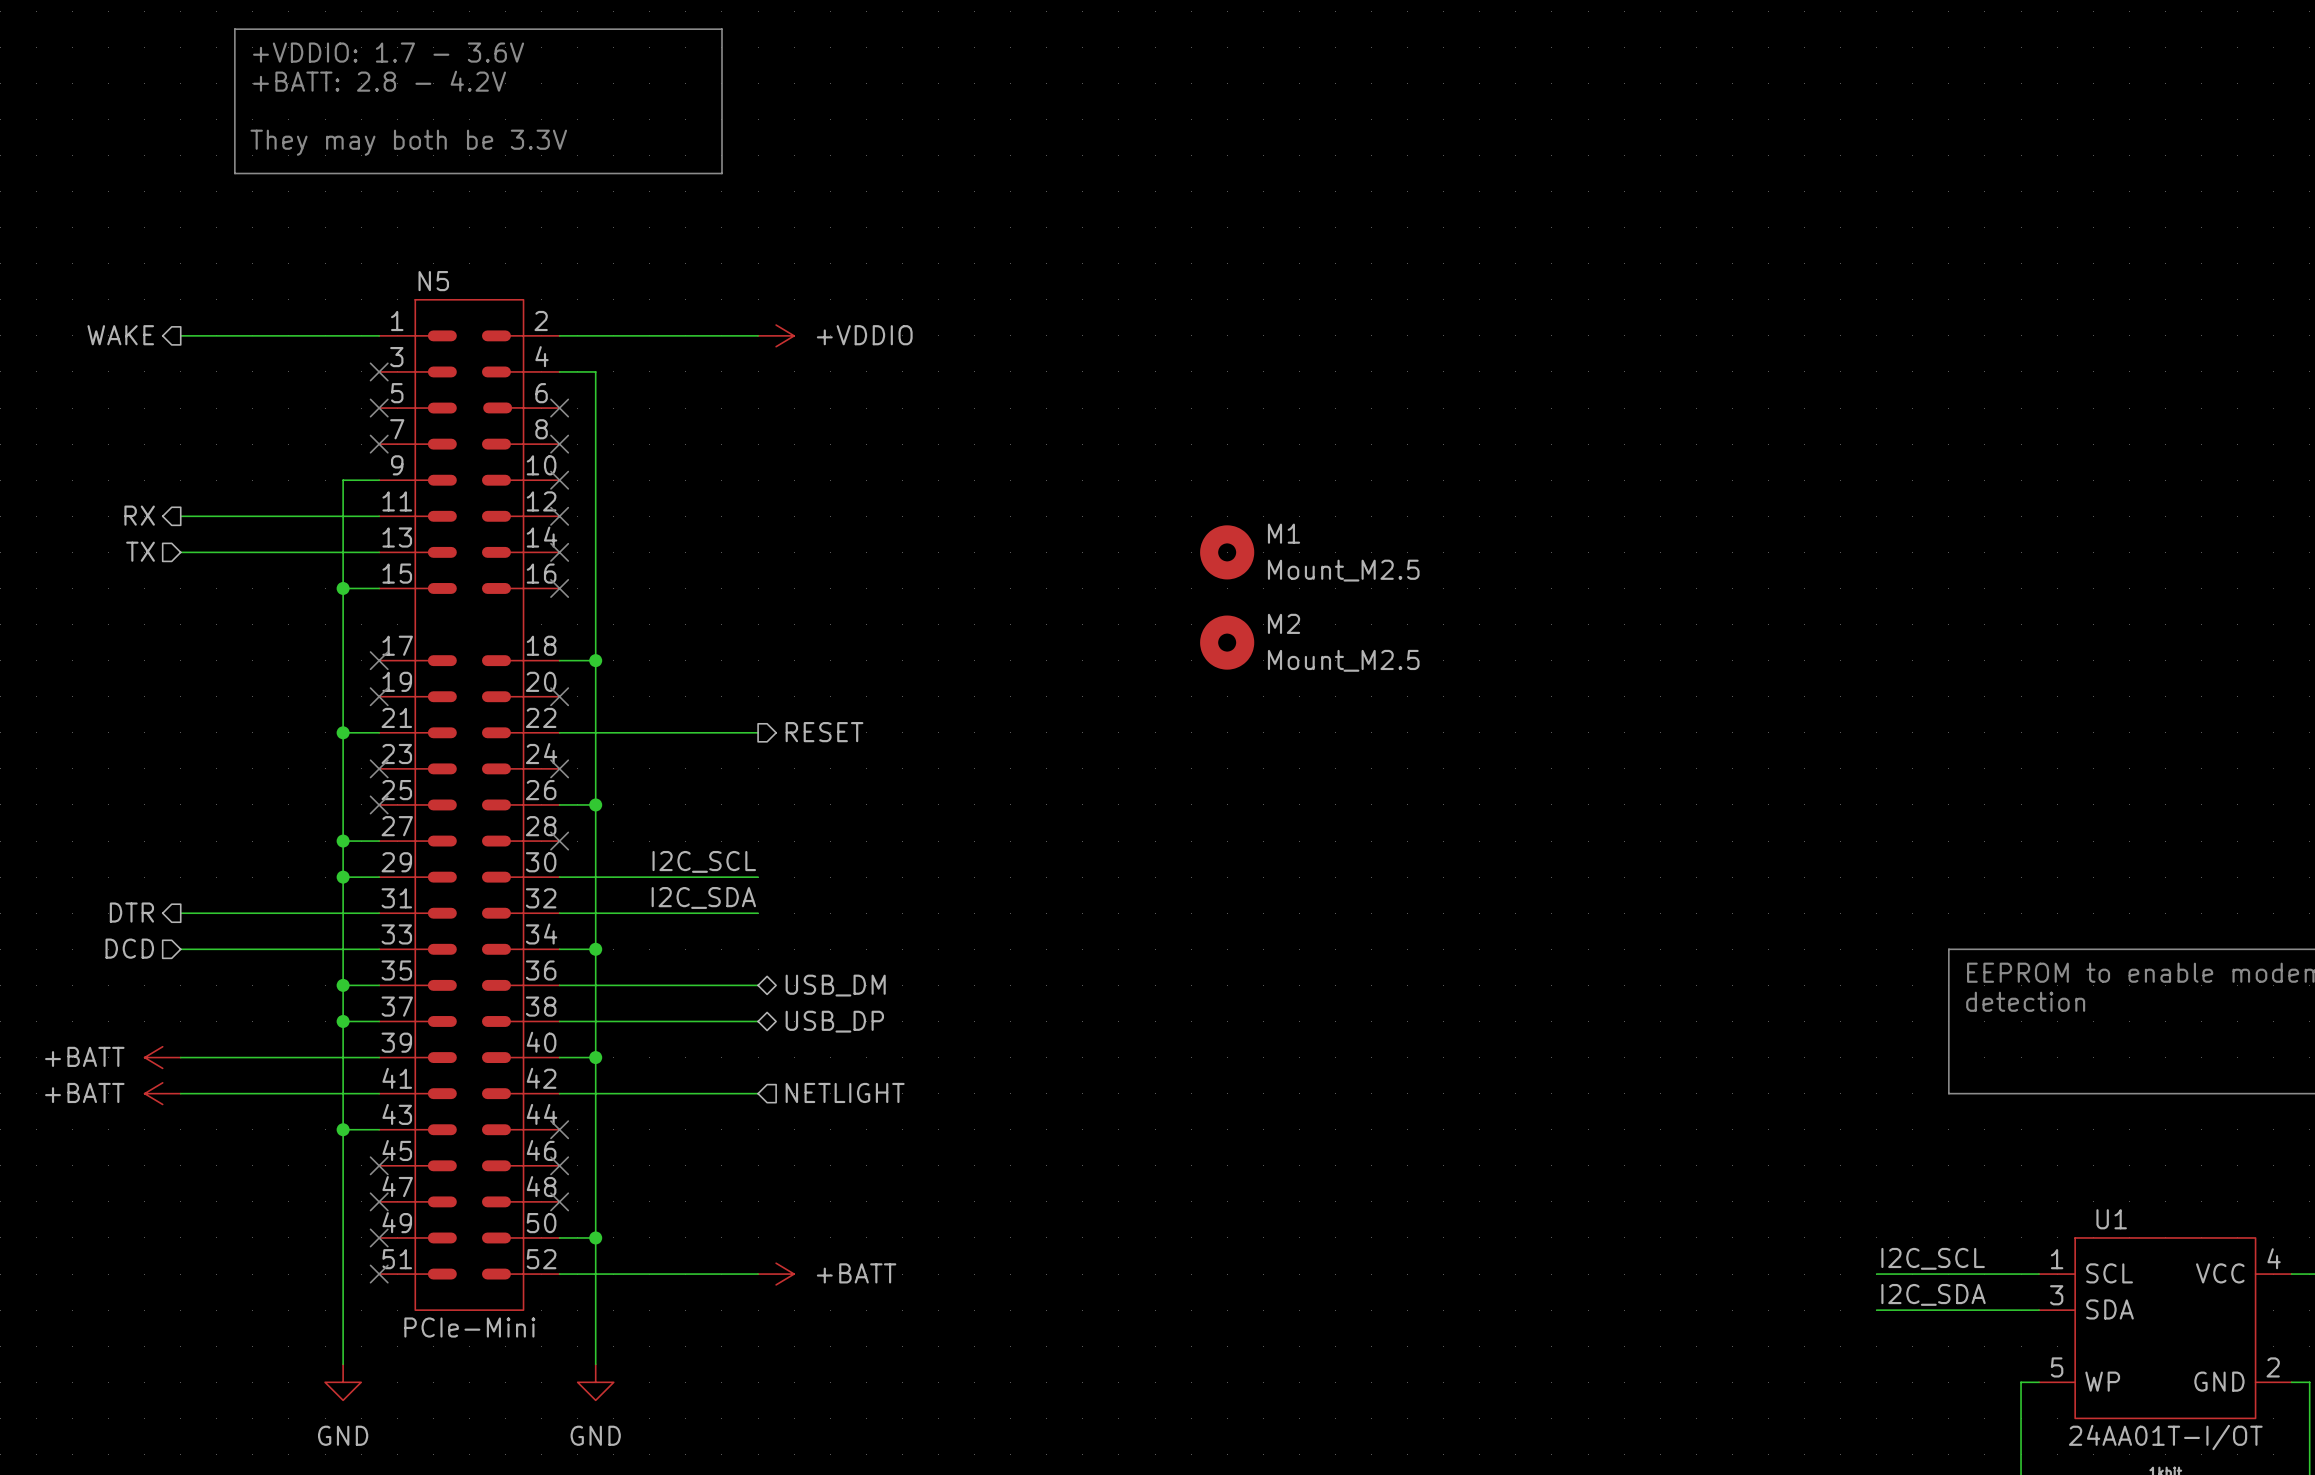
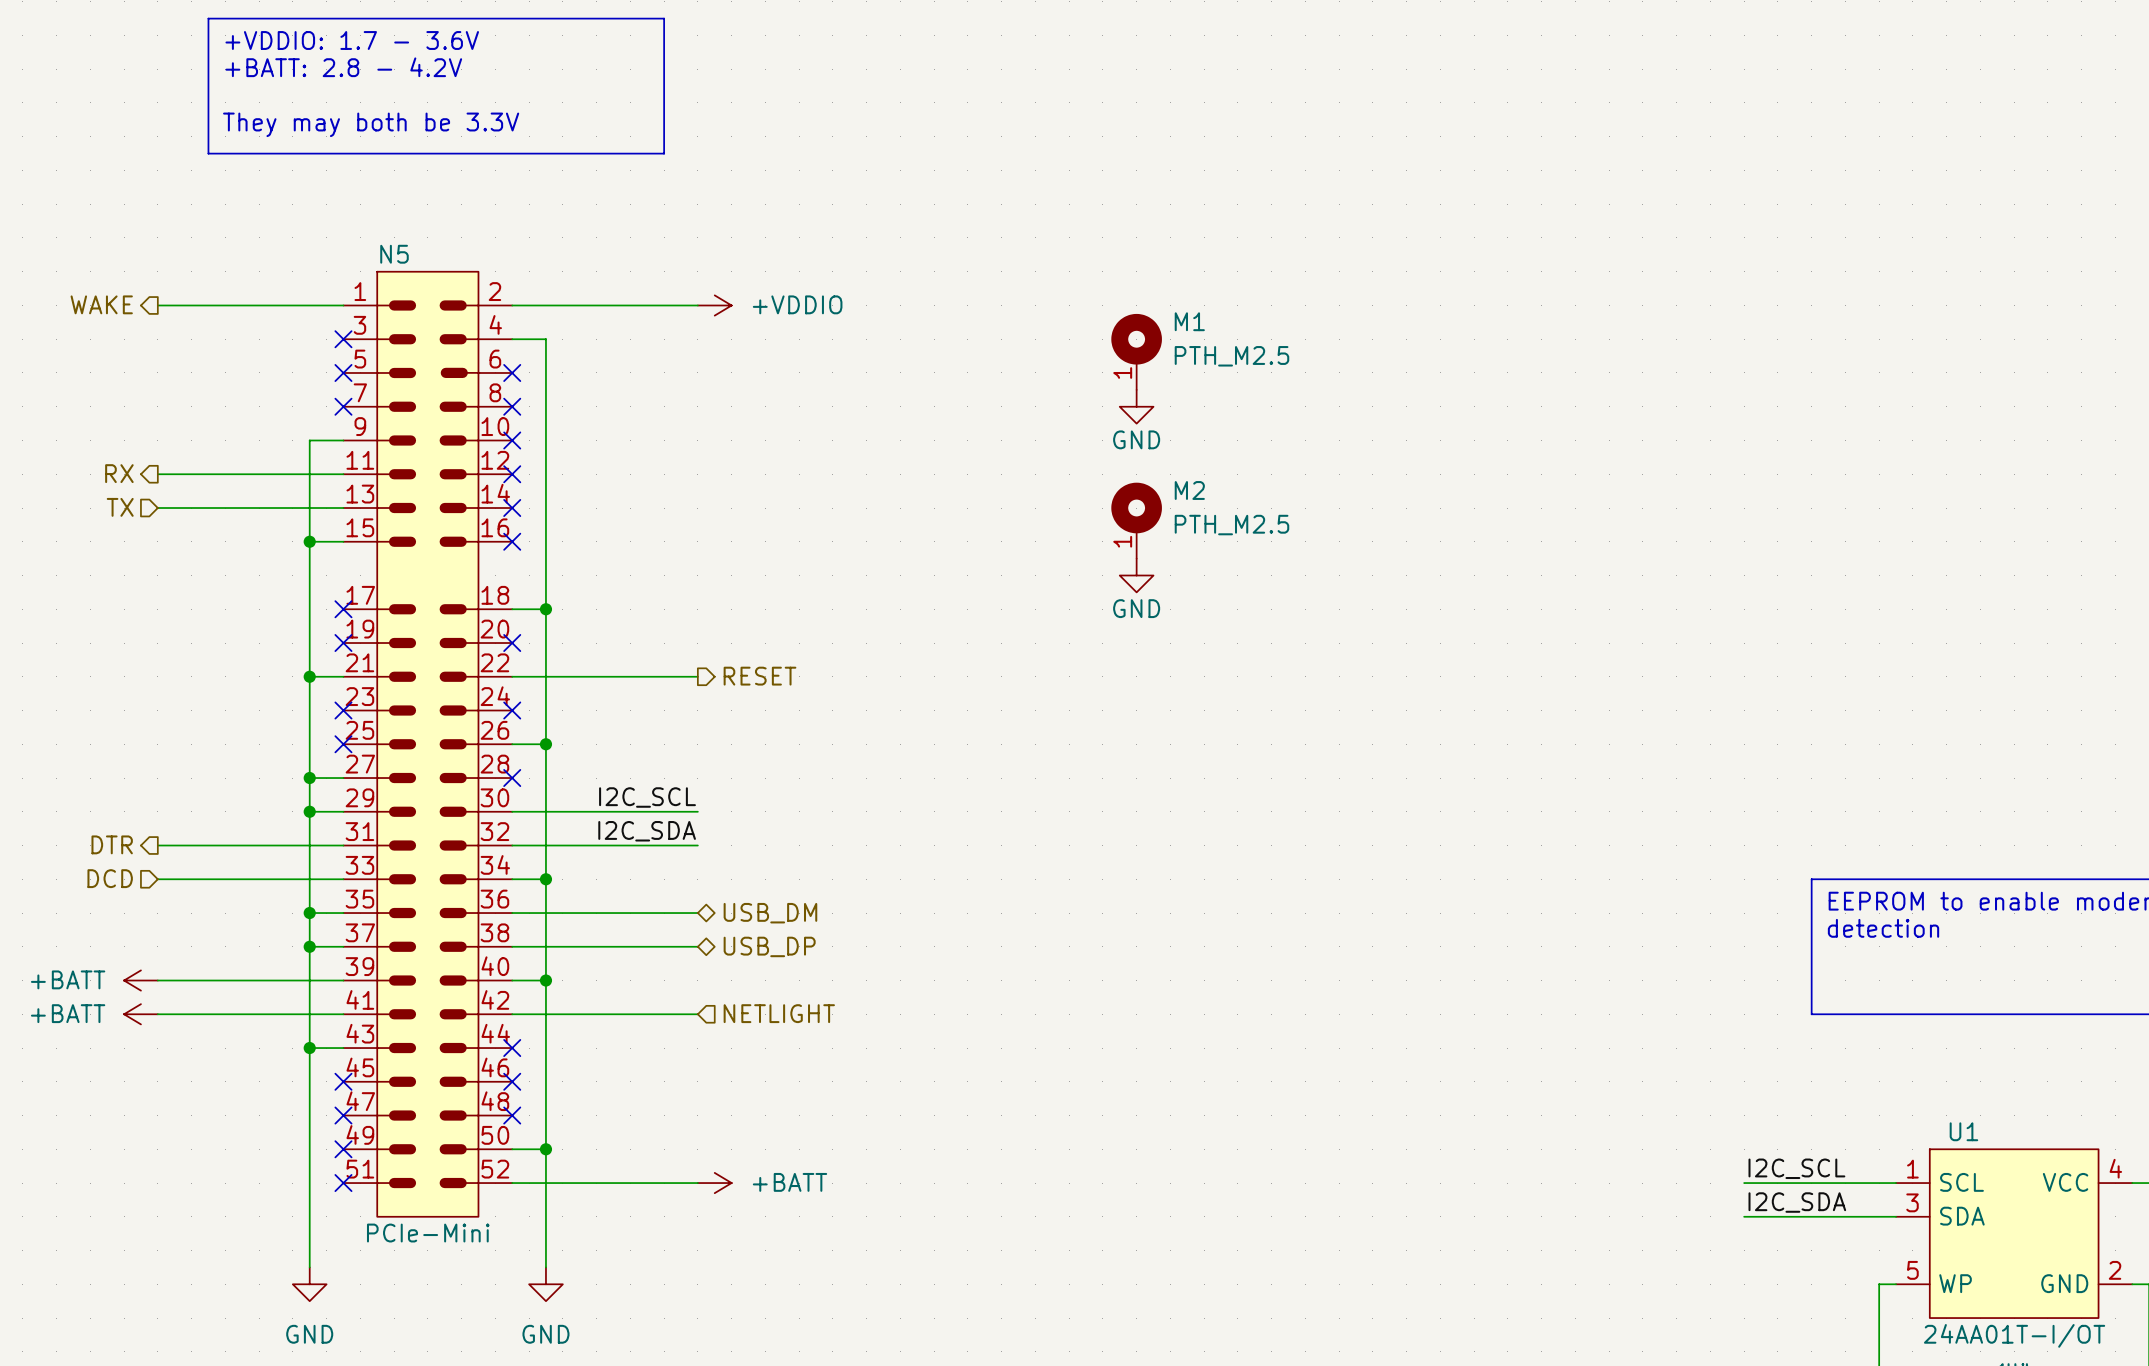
power symbol: none -> GND (1136, 406)
M1 symbol: [1200, 525, 1255, 580] -> [1111, 313, 1162, 390]
M1 value: Mount_M2.5 (1343, 570) -> PTH_M2.5 (1231, 356)
M2 symbol: [1200, 615, 1255, 670] -> [1111, 482, 1162, 559]
power symbol: none -> GND (1136, 575)
M2 value: Mount_M2.5 (1343, 660) -> PTH_M2.5 (1231, 525)

